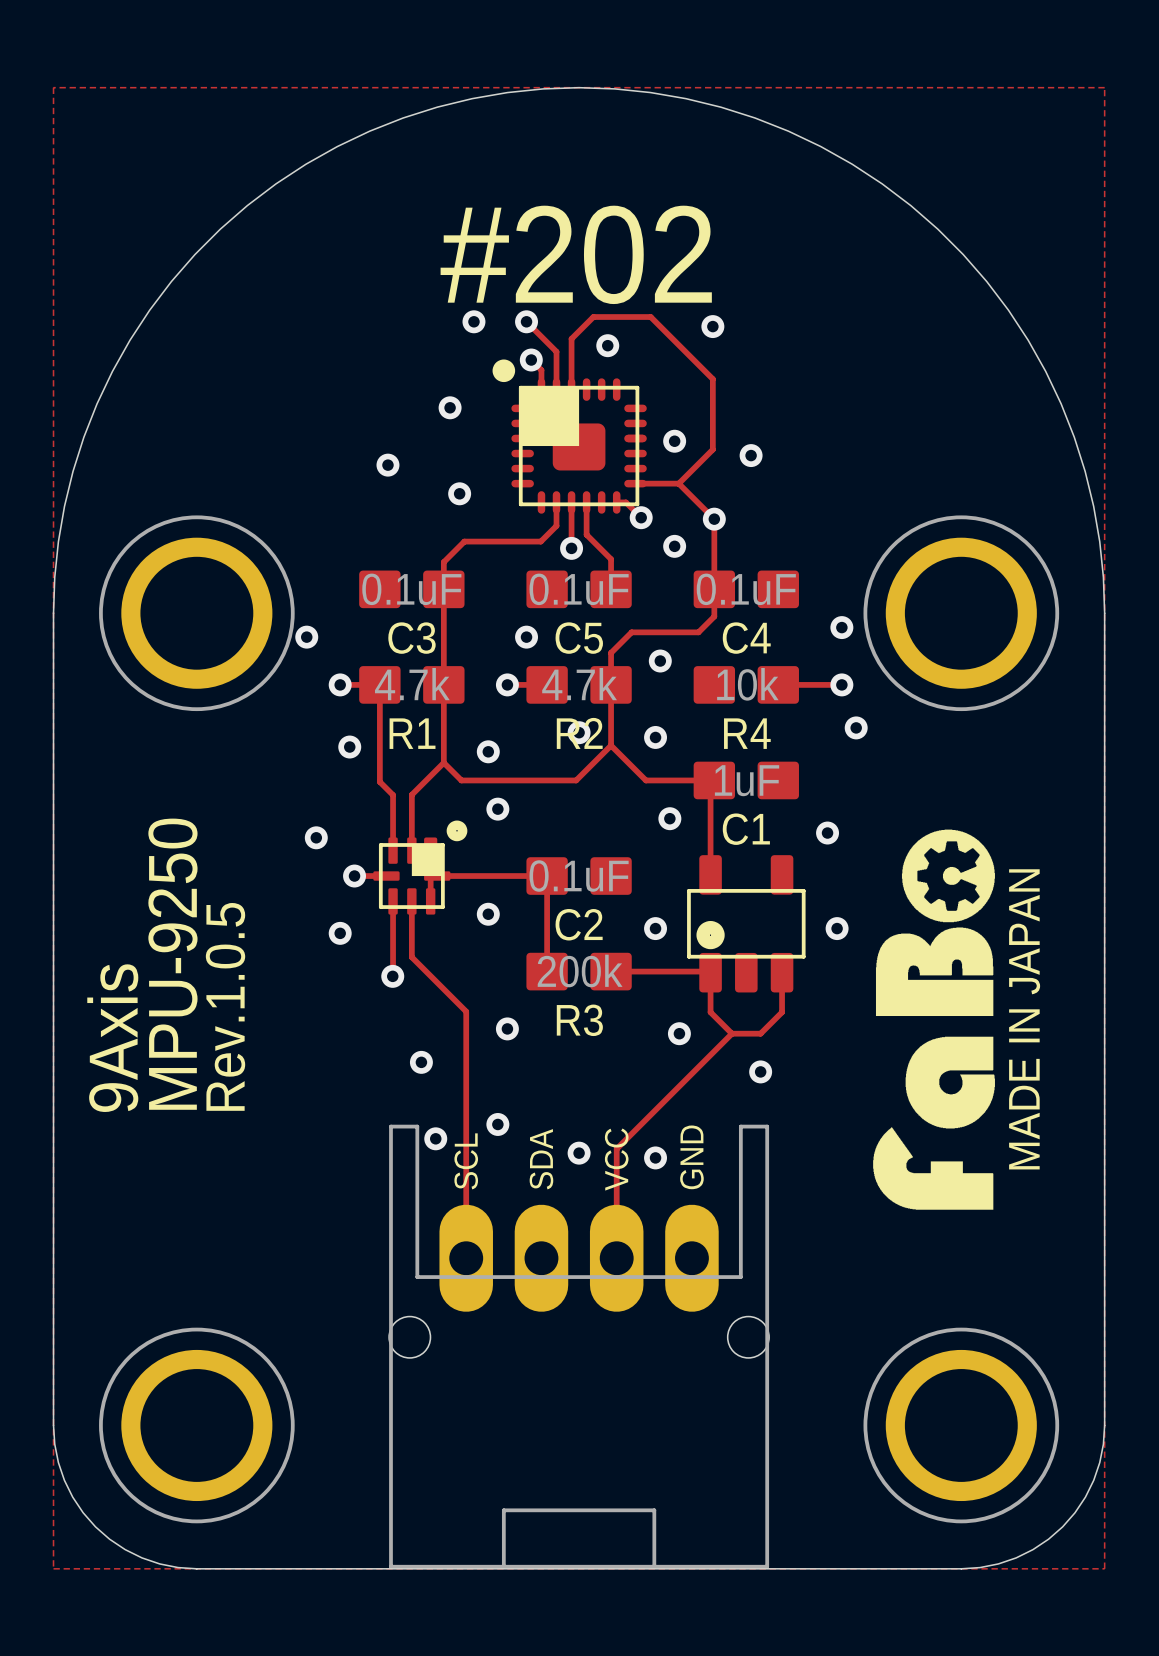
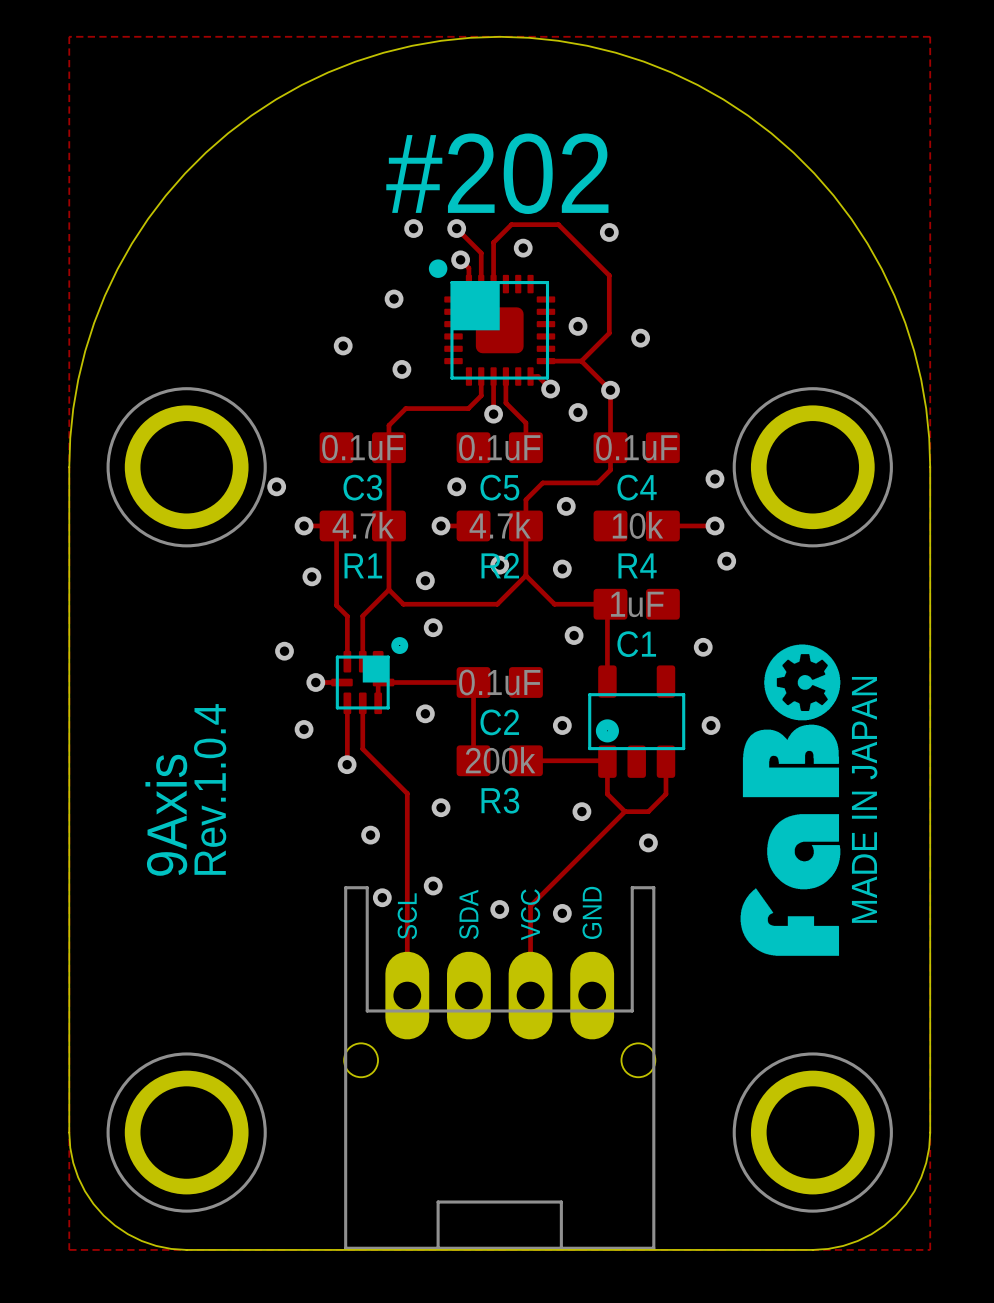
part footprint: [492, 359, 647, 514] -> [428, 259, 556, 386]
text: MPU-9250 (172, 964) -> 9Axis (166, 815)
text: Rev.1.0.5 (225, 1006) -> Rev.1.0.4 (210, 789)
text: 9Axis (112, 1038) -> none

